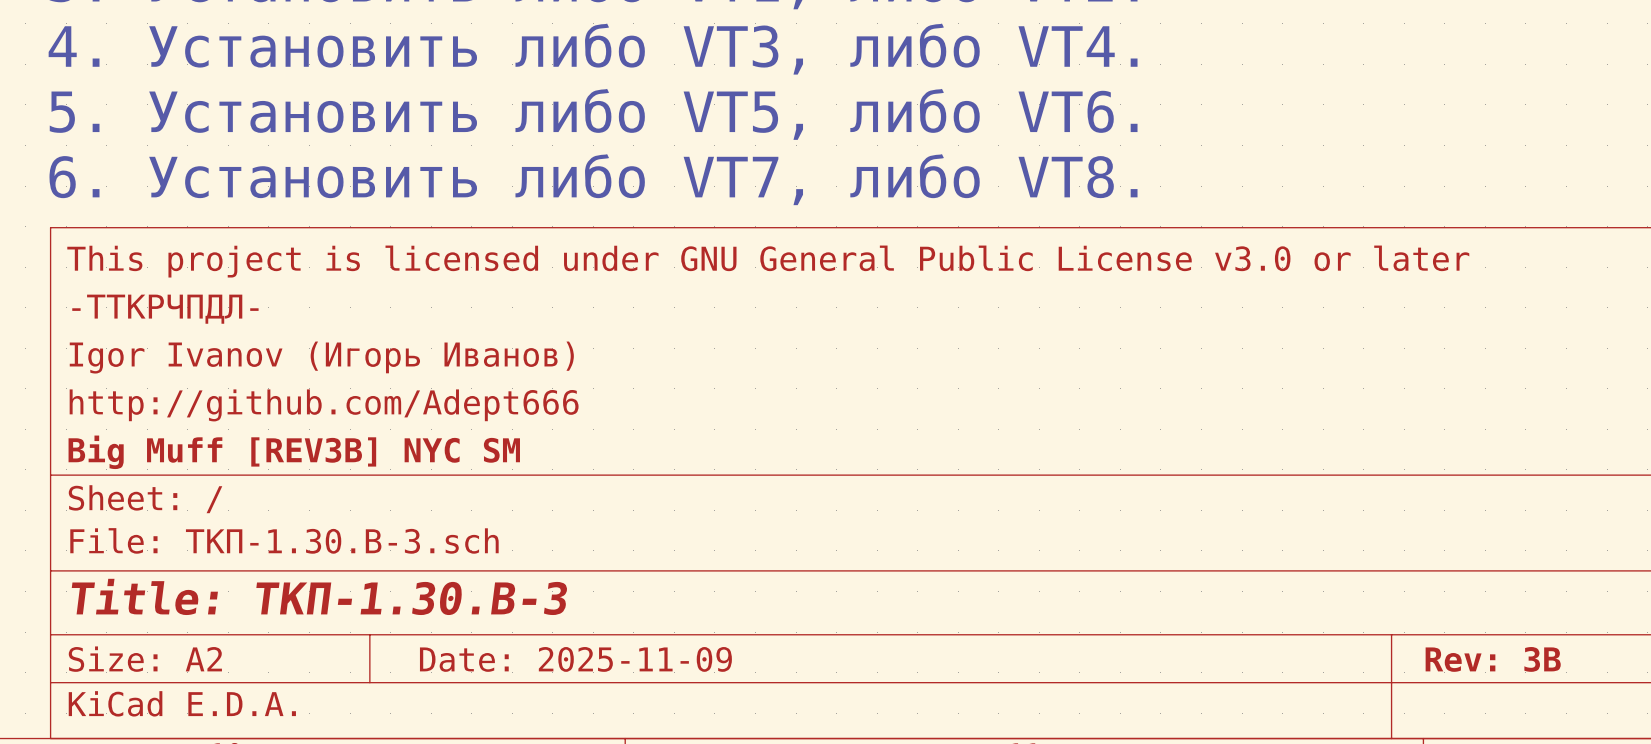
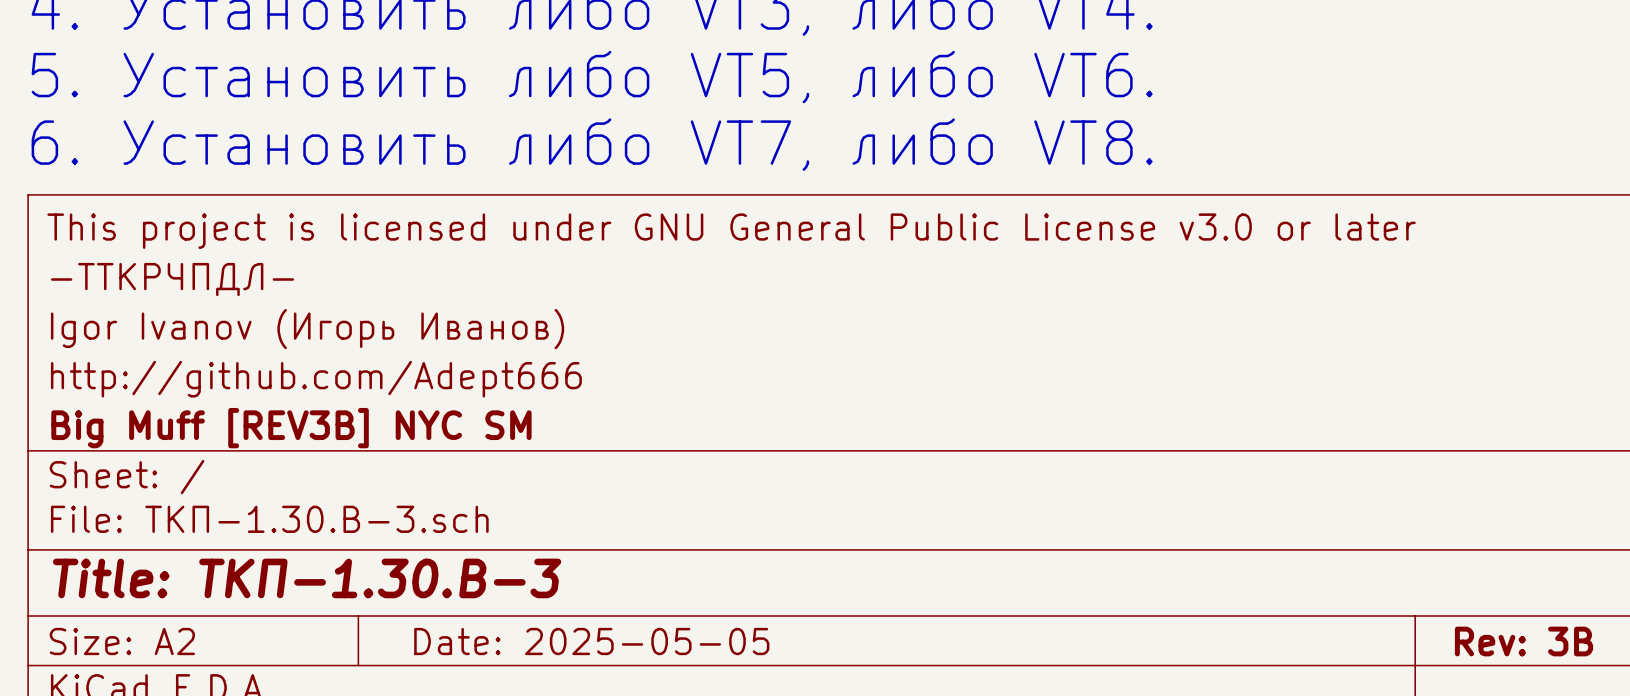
title block: Date: 2025-11-09 (575, 659) -> Date: 2025-05-05 (591, 641)

